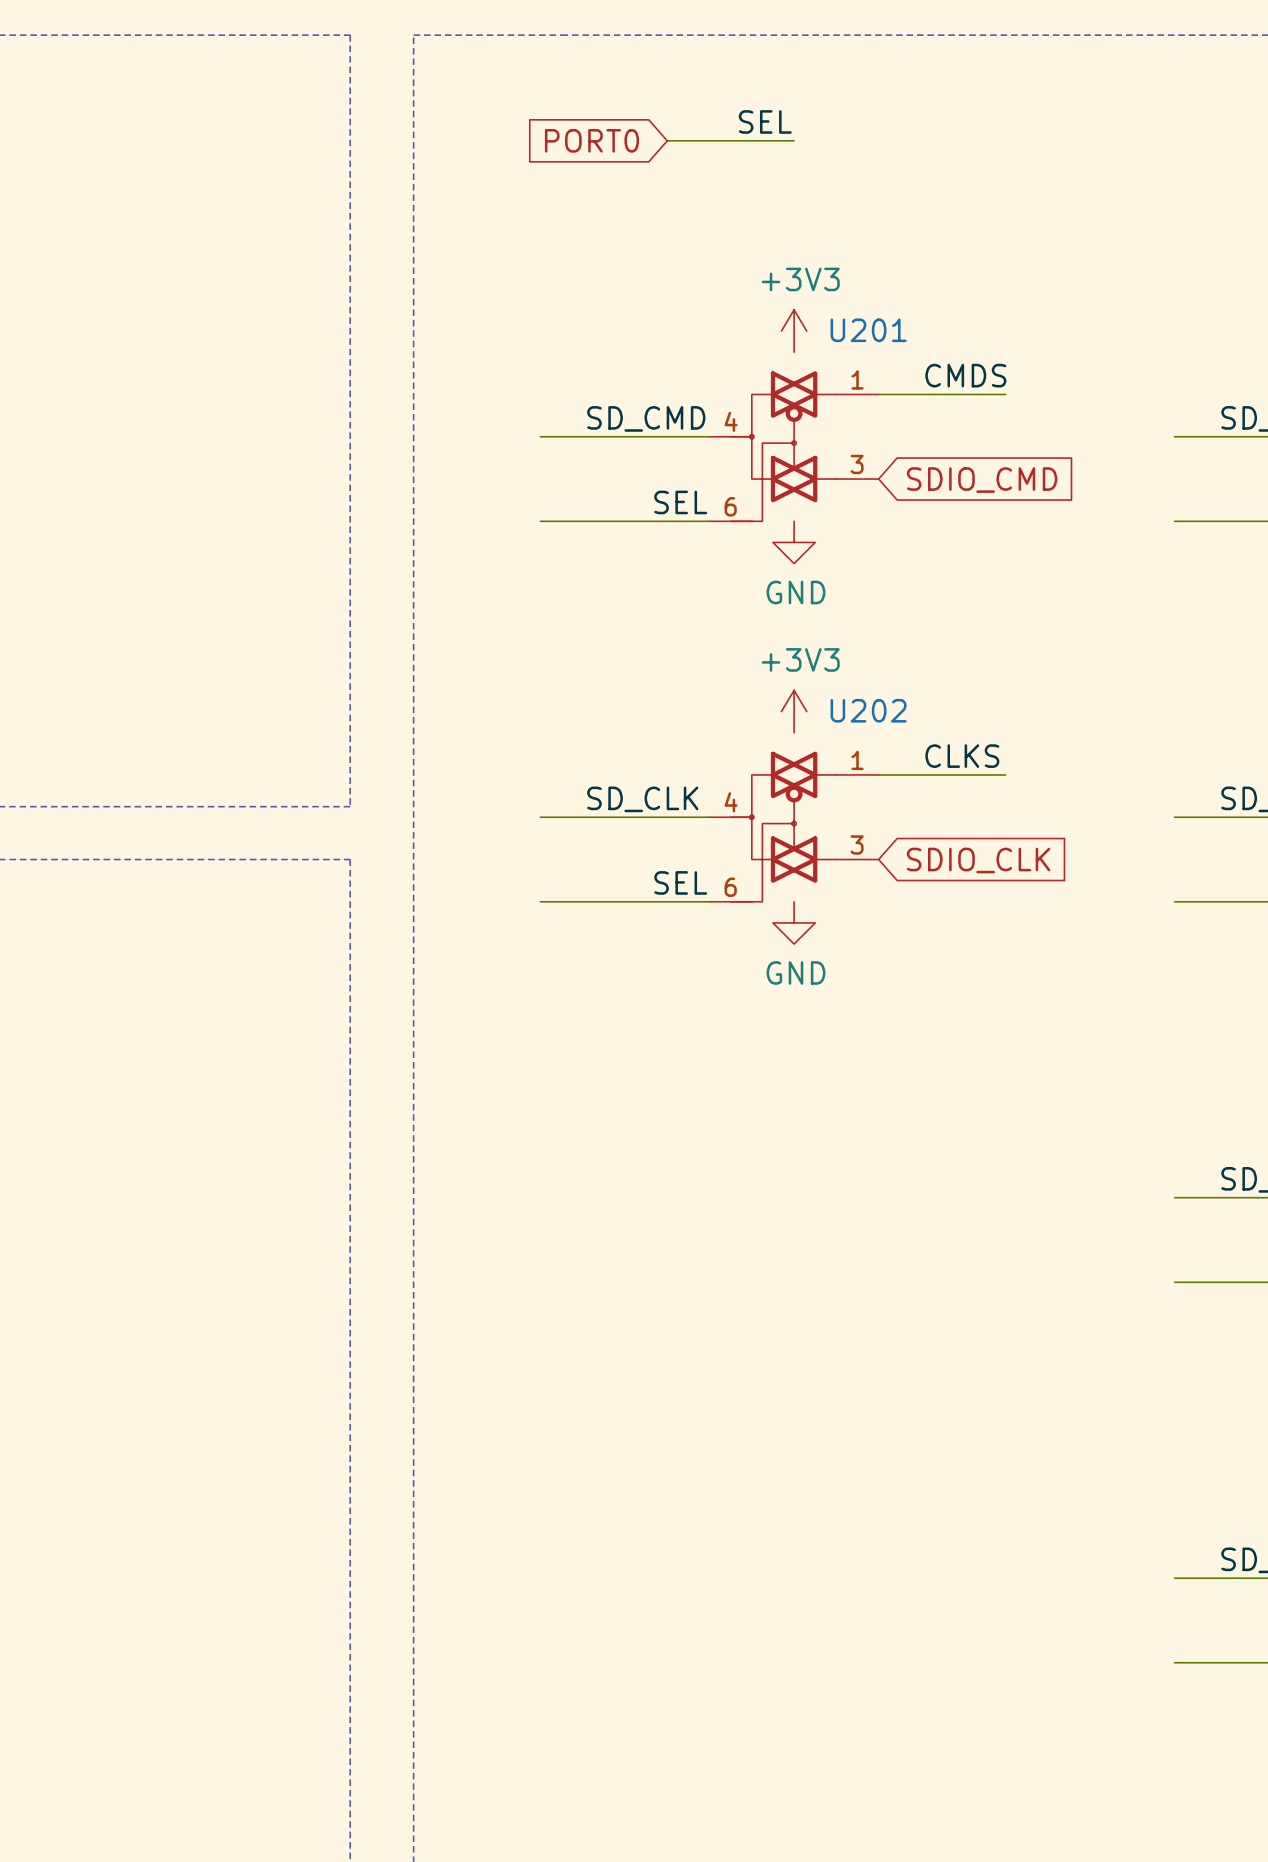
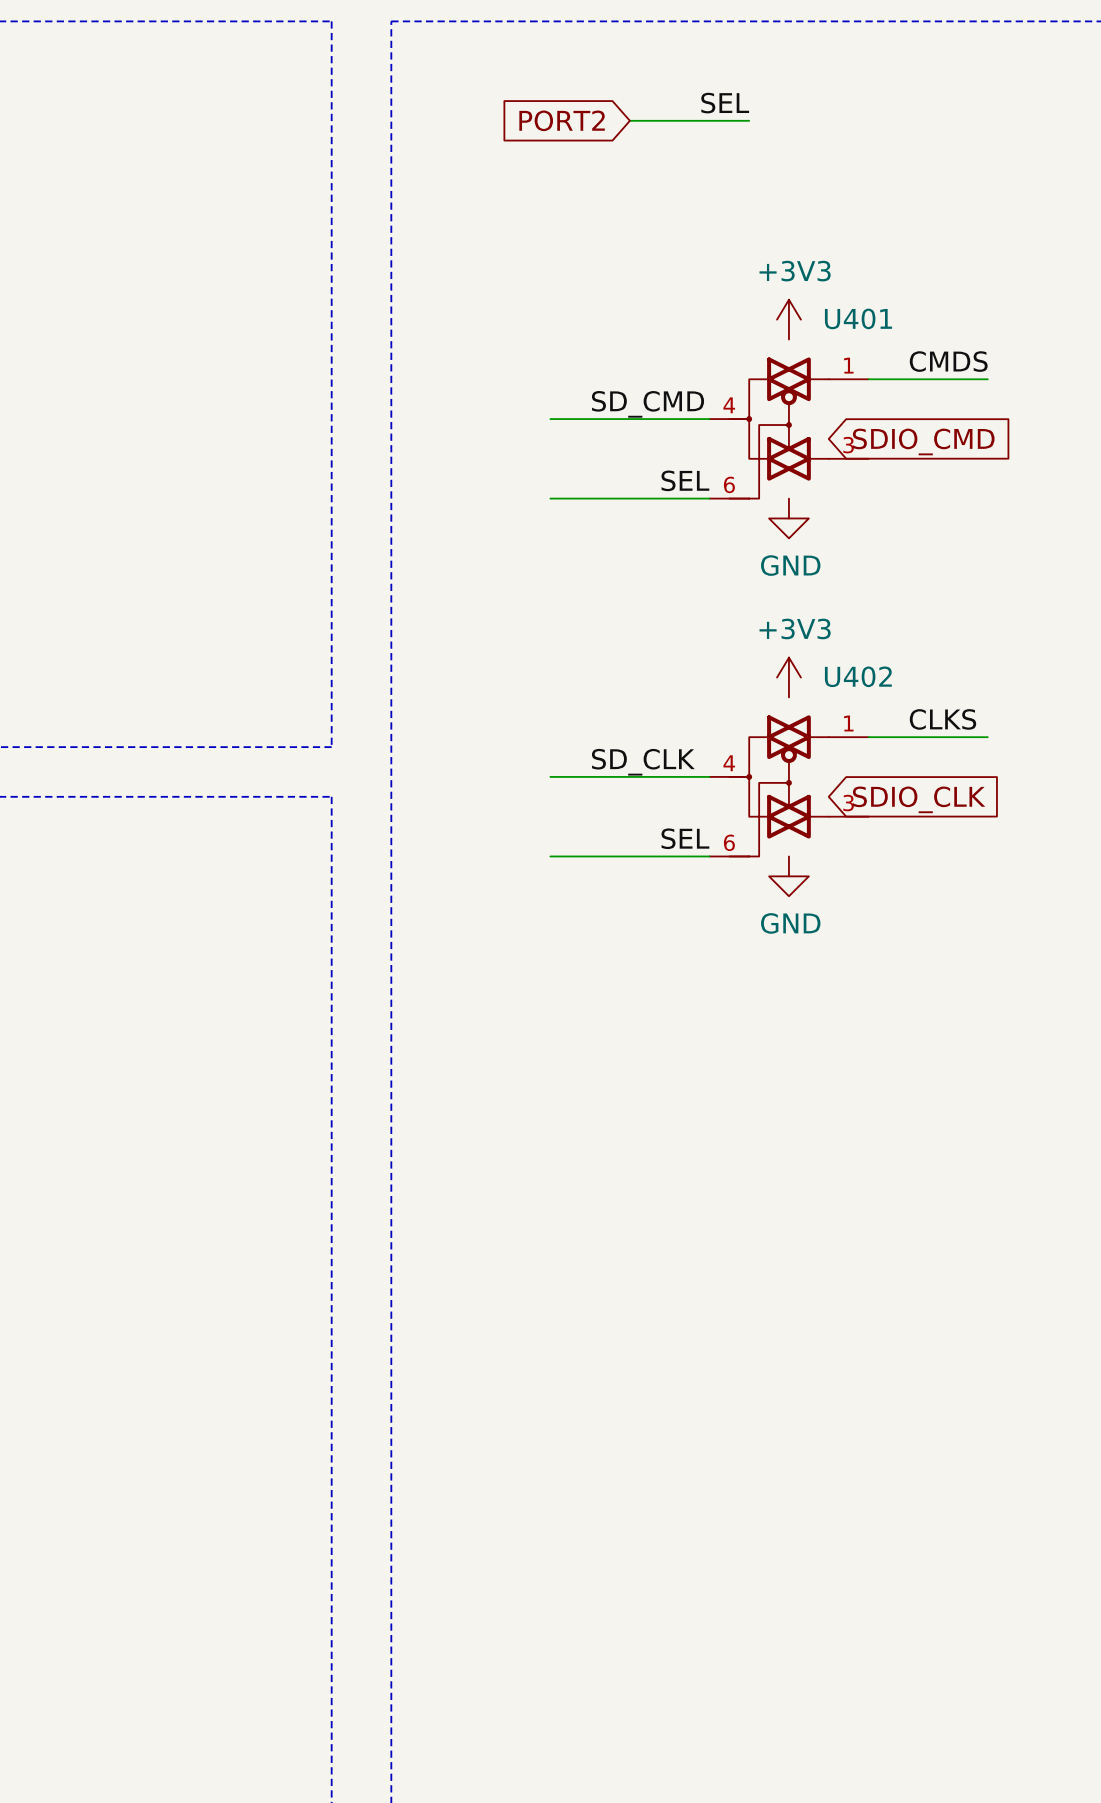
global label: PORT0 (591, 140) -> PORT2 (562, 120)
power symbol position: +3V3 (794, 331) -> +3V3 (788, 319)
label position: CMDS (965, 375) -> CMDS (948, 361)
wire: (878, 394) (1005, 394) -> (868, 379) (987, 379)
label position: SD_CMD (646, 418) -> SD_CMD (648, 404)
wire: (540, 436) (709, 436) -> (550, 419) (709, 419)
U201: (794, 446) -> none
U401: none -> (788, 428)
label position: SEL (680, 502) -> SEL (685, 480)
wire: (540, 521) (709, 521) -> (550, 498) (709, 498)
power symbol position: GND (794, 542) -> GND (788, 518)
power symbol position: +3V3 (794, 711) -> +3V3 (788, 677)
label position: CLKS (962, 756) -> CLKS (942, 719)
wire: (878, 774) (1005, 774) -> (868, 737) (987, 737)
label position: SD_CLK (642, 799) -> SD_CLK (643, 762)
wire: (540, 817) (709, 817) -> (550, 776) (709, 776)
U202: (794, 826) -> none
U402: none -> (788, 785)
label position: SEL (680, 882) -> SEL (685, 838)
wire: (540, 901) (709, 901) -> (550, 856) (709, 856)
power symbol position: GND (794, 922) -> GND (788, 876)

